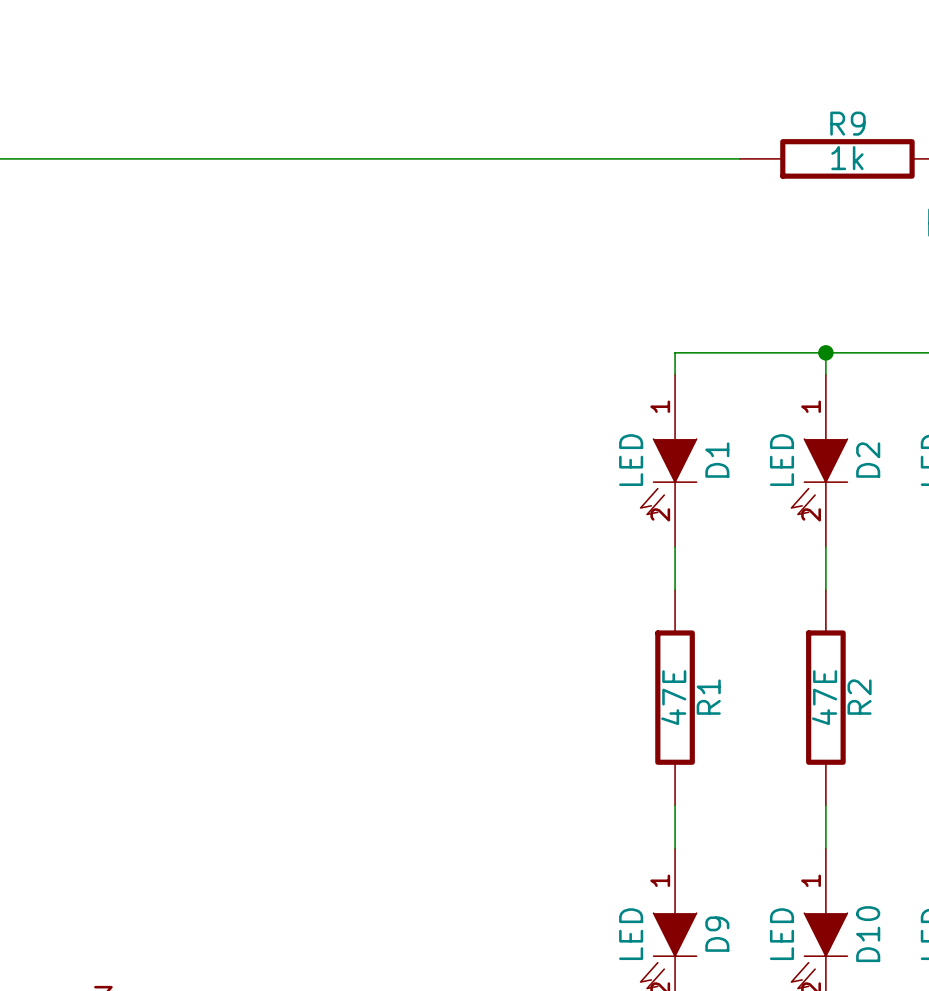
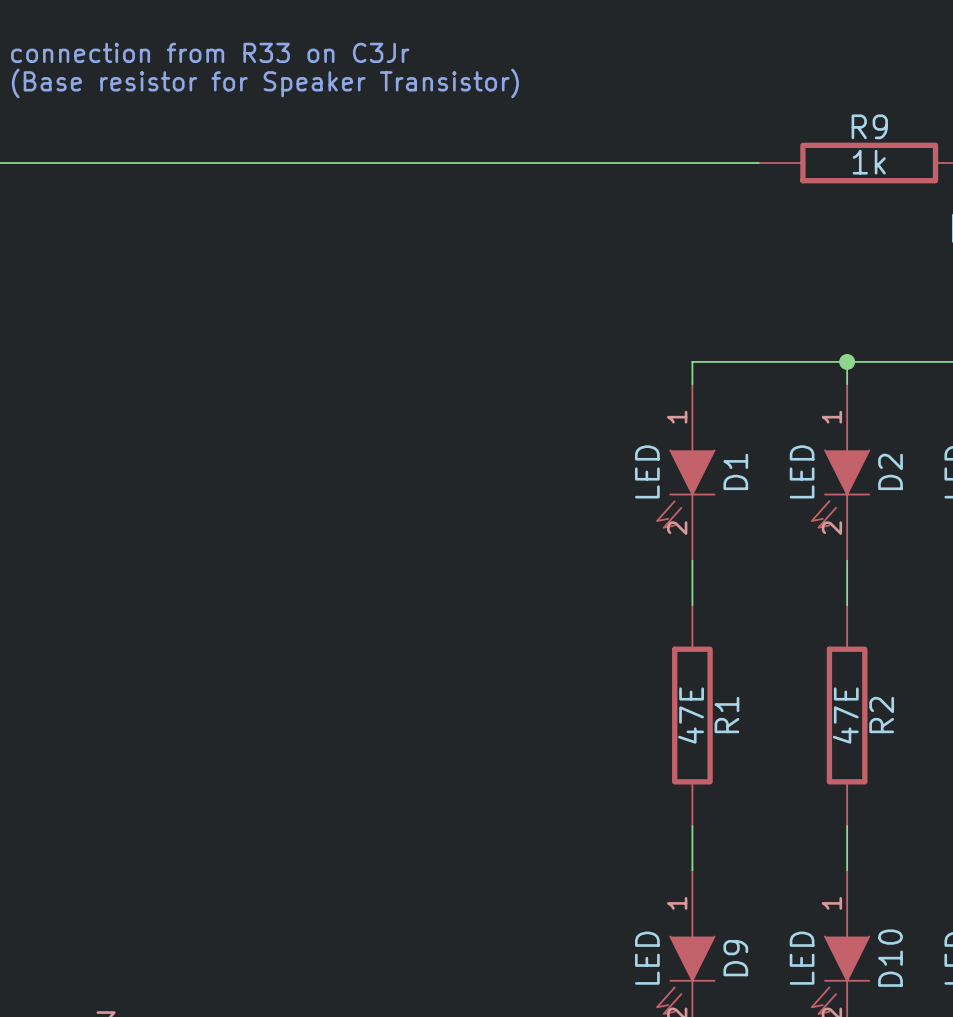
text: none -> connection from R33 on C3Jr (210, 52)
text: none -> (Base resistor for Speaker Transistor) (265, 83)

